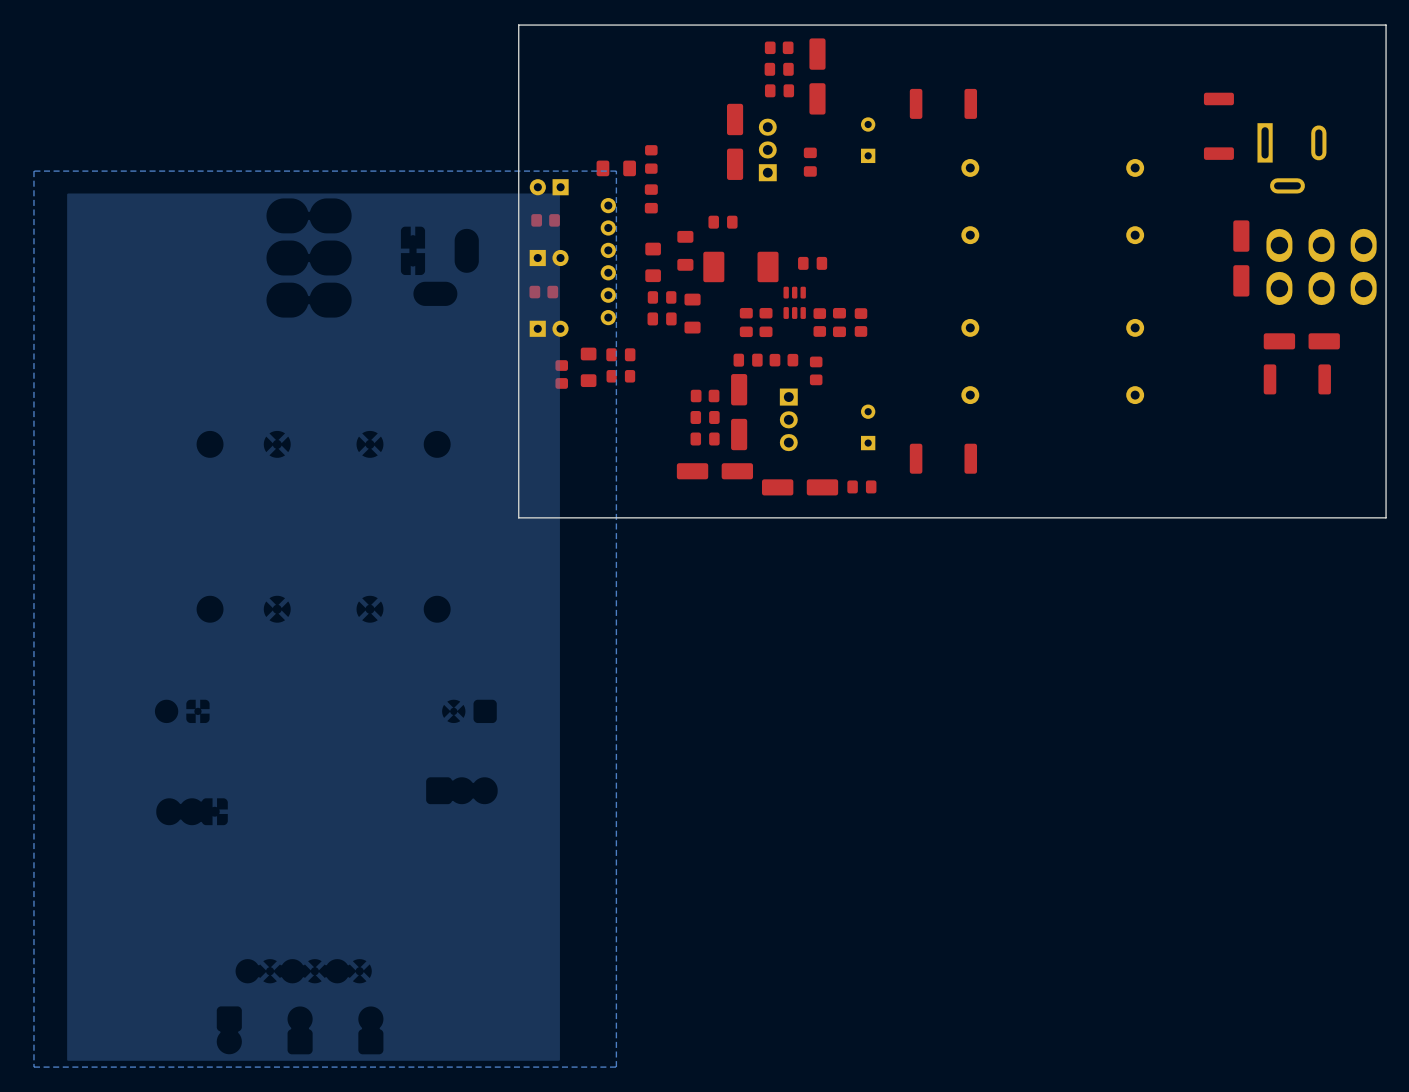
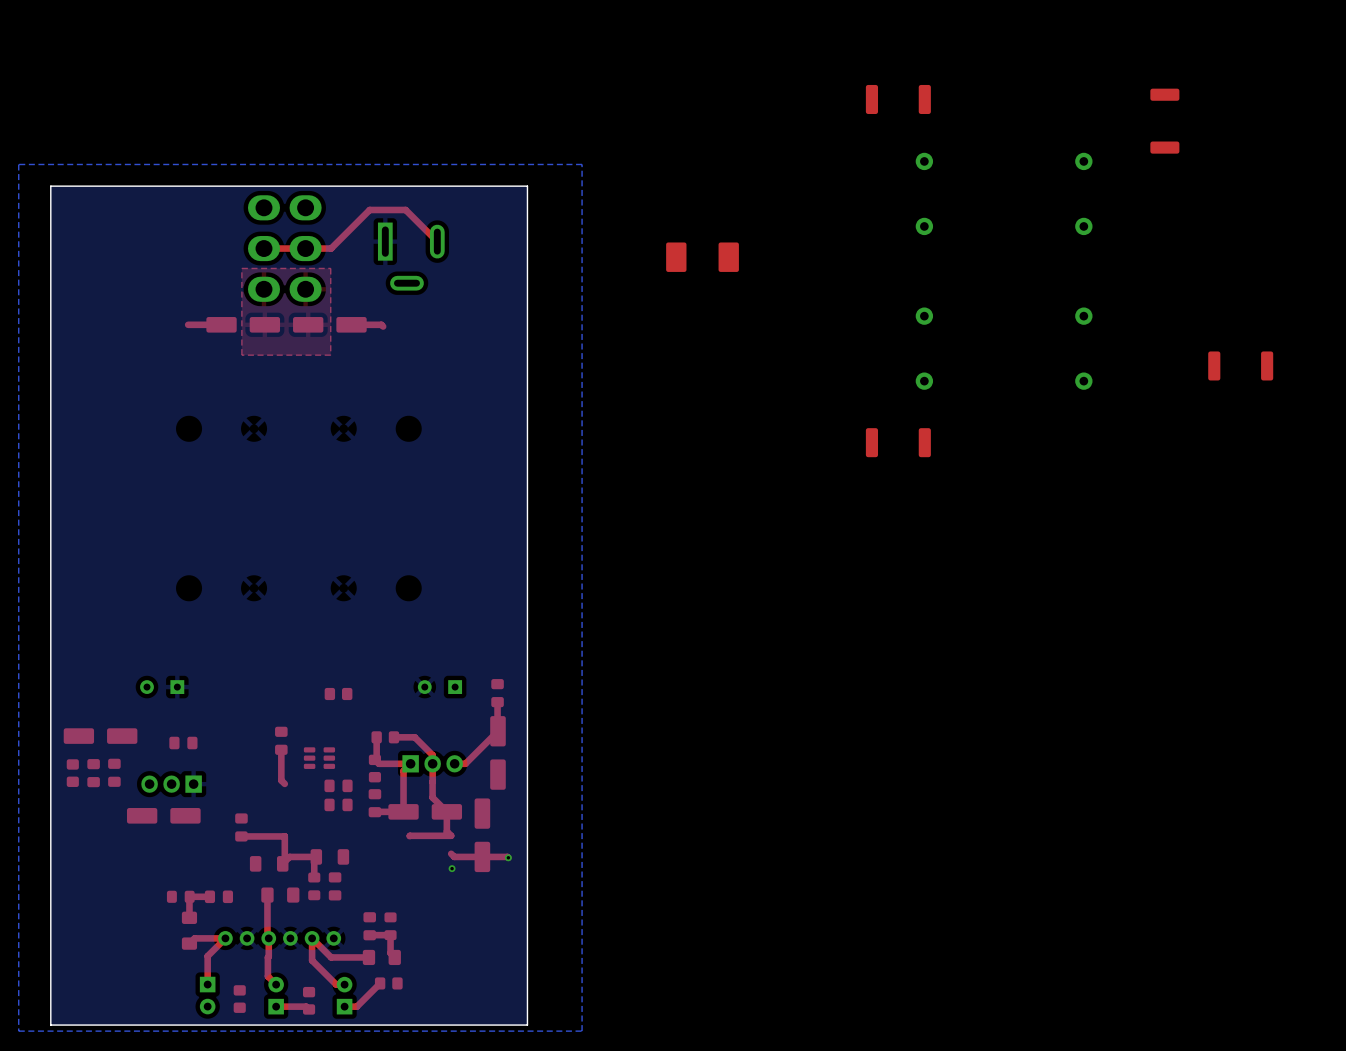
board edge: (1386, 25) (518, 25) (518, 517) (1386, 517) (1386, 25) -> none
part: (779, 47) -> none
part: (779, 69) -> none
part: (817, 76) -> none
part: (779, 90) -> none
part: (868, 140) -> none
part: (735, 141) -> none
part: (767, 149) -> none
part: (1291, 158) -> none
part: (651, 159) -> none
part: (810, 162) -> none
part: (616, 168) -> none
part: (549, 187) -> none
board edge: none -> (527, 186) (50, 186) (50, 1025) (527, 1025) (527, 186)
part: (651, 198) -> none
part: (545, 220) -> none
part: (723, 222) -> none
top track: none -> (437, 241) (405, 209) (369, 209) (331, 248) (263, 248)
part: (685, 250) -> none
part: none -> (284, 248)
part: (549, 258) -> none
part: (1241, 258) -> none
part: (608, 261) -> none
part: (653, 262) -> none
part: (812, 263) -> none
part: none -> (411, 256)
part: (1321, 266) -> none
top zone outline: none -> (330, 268) (330, 355) (241, 355) (241, 268) (330, 268)
part: (543, 292) -> none
part: (662, 297) -> none
part: (794, 302) -> none
part: (692, 313) -> none
part: (662, 318) -> none
part: (746, 322) -> none
part: (766, 322) -> none
part: (819, 322) -> none
part: (839, 322) -> none
part: (860, 322) -> none
part: (549, 328) -> none
top track: none -> (221, 324) (188, 324)
part: none -> (243, 324)
part: none -> (329, 324)
top track: none -> (351, 324) (381, 324) (383, 326)
part: (1301, 341) -> none
part: (620, 354) -> none
part: (748, 360) -> none
part: (783, 360) -> none
part: (588, 367) -> none
part: (816, 370) -> none
part: (561, 374) -> none
part: (620, 376) -> none
part: (705, 395) -> none
part: (739, 412) -> none
part: (705, 417) -> none
part: (788, 419) -> none
part: (868, 427) -> none
part: (705, 439) -> none
part: (714, 471) -> none
part: (861, 486) -> none
part: (800, 487) -> none
part: none -> (162, 687)
part: none -> (439, 687)
part: none -> (497, 693)
part: none -> (338, 694)
top track: none -> (497, 702) (497, 731) (465, 763) (454, 763)
part: none -> (100, 736)
top track: none -> (376, 737) (376, 758) (374, 759) (378, 763) (410, 763) (403, 770) (403, 811) (374, 812)
part: none -> (385, 737)
top track: none -> (393, 737) (414, 737) (432, 755) (432, 781)
part: none -> (281, 740)
part: none -> (183, 743)
top track: none -> (281, 749) (281, 780) (284, 783)
part: none -> (497, 752)
part: none -> (319, 758)
part: none -> (432, 763)
part: none -> (374, 768)
part: none -> (72, 773)
part: none -> (93, 773)
part: none -> (114, 772)
top track: none -> (432, 781) (432, 797) (446, 811) (446, 831) (451, 835) (409, 836)
part: none -> (171, 784)
part: none -> (338, 785)
part: none -> (374, 803)
part: none -> (338, 804)
part: none -> (425, 811)
part: none -> (163, 815)
part: none -> (241, 827)
part: none -> (482, 835)
top track: none -> (284, 836) (241, 836)
top track: none -> (284, 836) (284, 861)
top track: none -> (451, 853) (454, 856) (508, 857)
part: none -> (329, 856)
via: none -> (508, 857)
part: none -> (269, 863)
top track: none -> (282, 863) (289, 856) (316, 856) (314, 858) (314, 877)
via: none -> (452, 868)
part: none -> (314, 886)
part: none -> (335, 886)
top track: none -> (267, 895) (267, 976) (276, 984)
part: none -> (280, 895)
part: none -> (180, 896)
top track: none -> (209, 896) (189, 897) (189, 917)
part: none -> (218, 896)
part: none -> (369, 926)
part: none -> (390, 926)
part: none -> (189, 930)
top track: none -> (369, 935) (390, 935) (390, 953) (394, 957)
part: none -> (279, 938)
top track: none -> (189, 943) (194, 938) (225, 938) (207, 956) (207, 984)
top track: none -> (368, 957) (331, 957) (312, 938) (312, 960) (336, 984) (344, 984)
part: none -> (381, 957)
top track: none -> (380, 983) (356, 1006) (344, 1006)
part: none -> (388, 983)
part: none -> (207, 995)
part: none -> (276, 995)
part: none -> (344, 995)
part: none -> (239, 999)
part: none -> (309, 1000)
top track: none -> (276, 1006) (306, 1006) (309, 1009)

